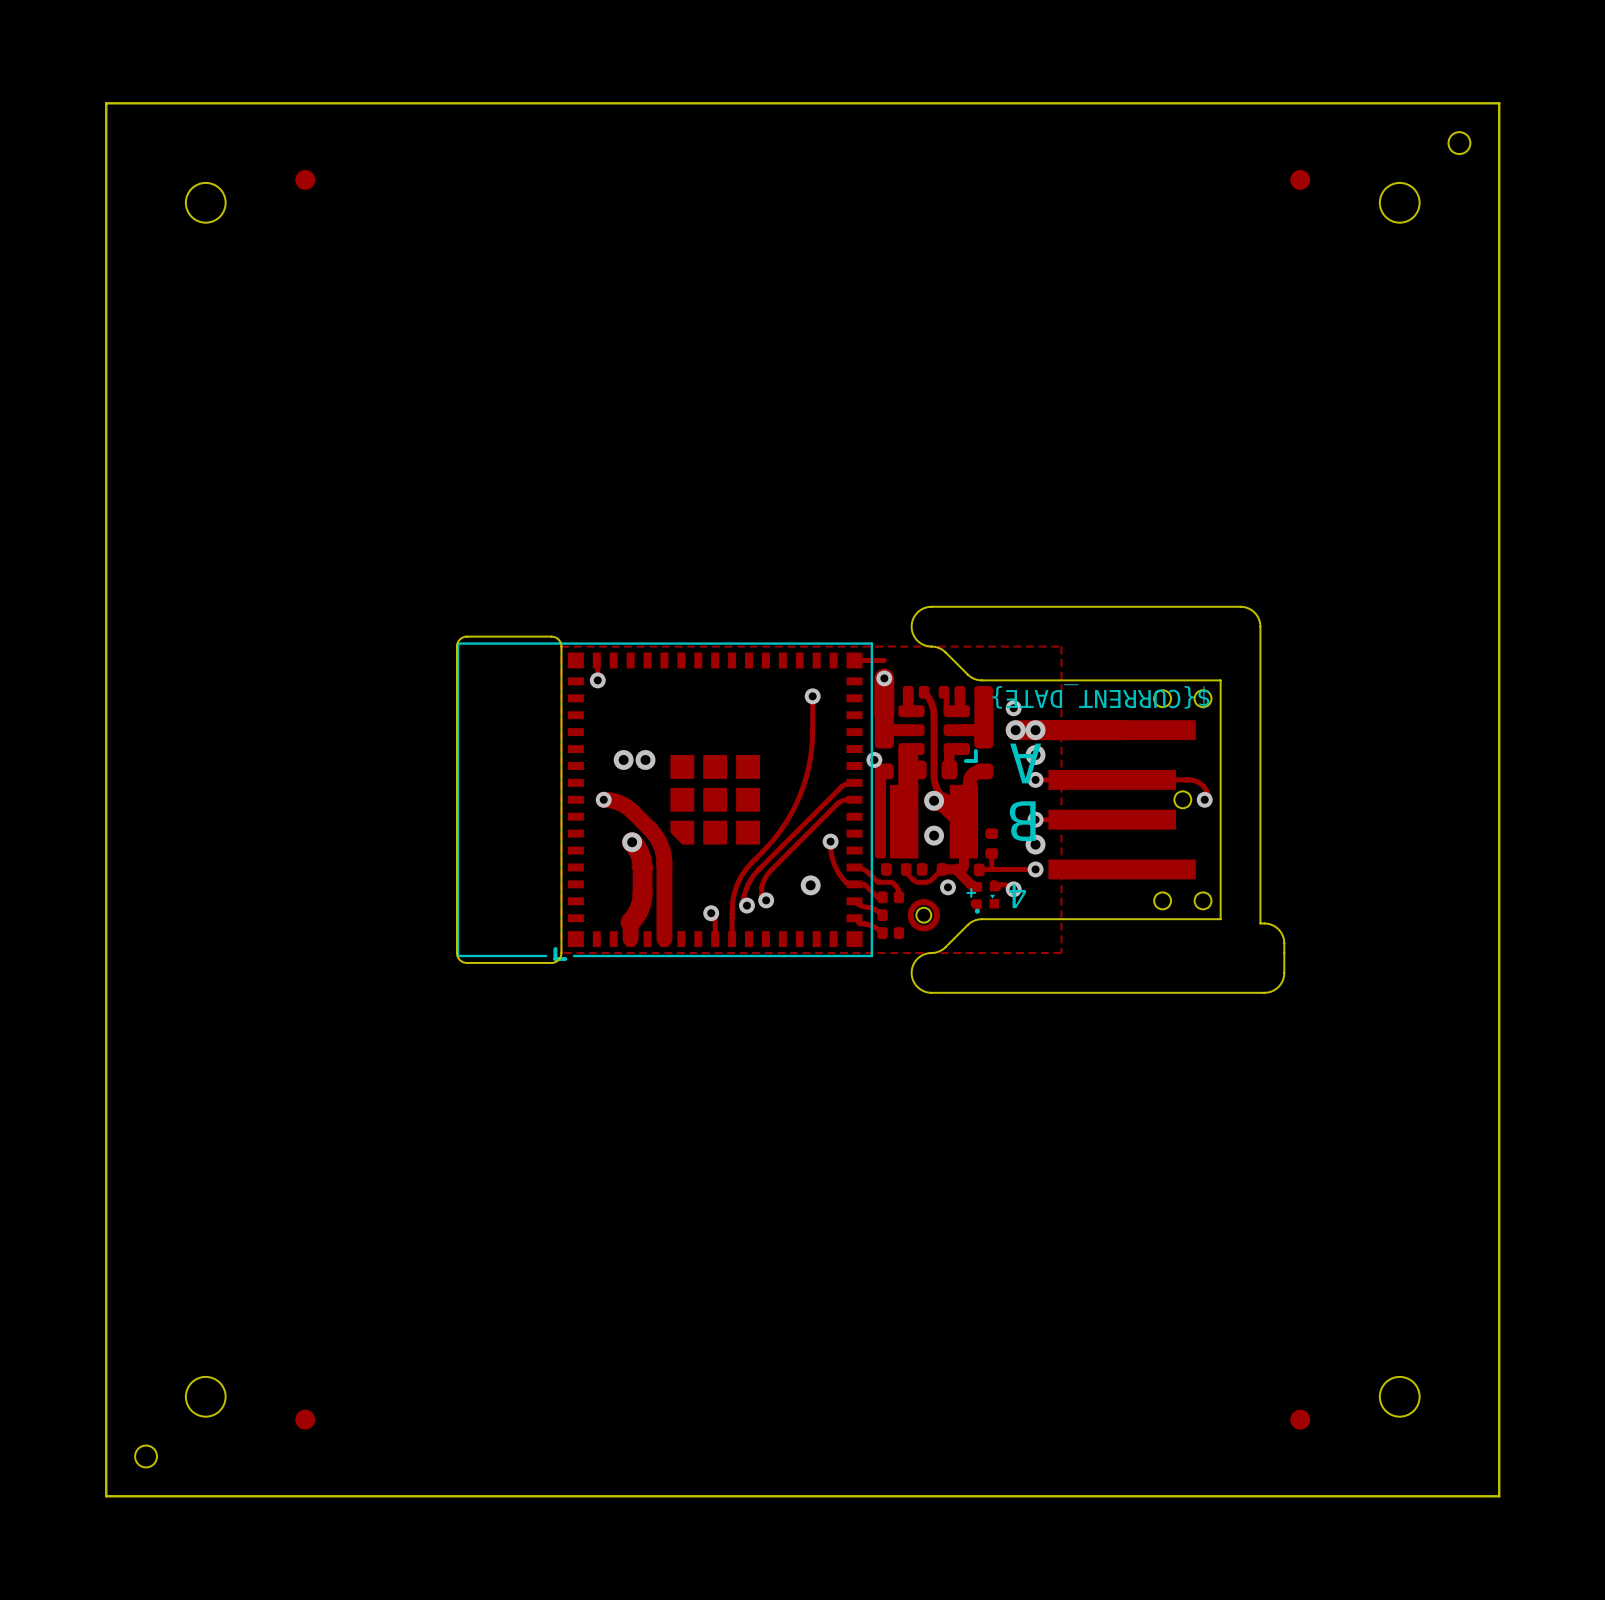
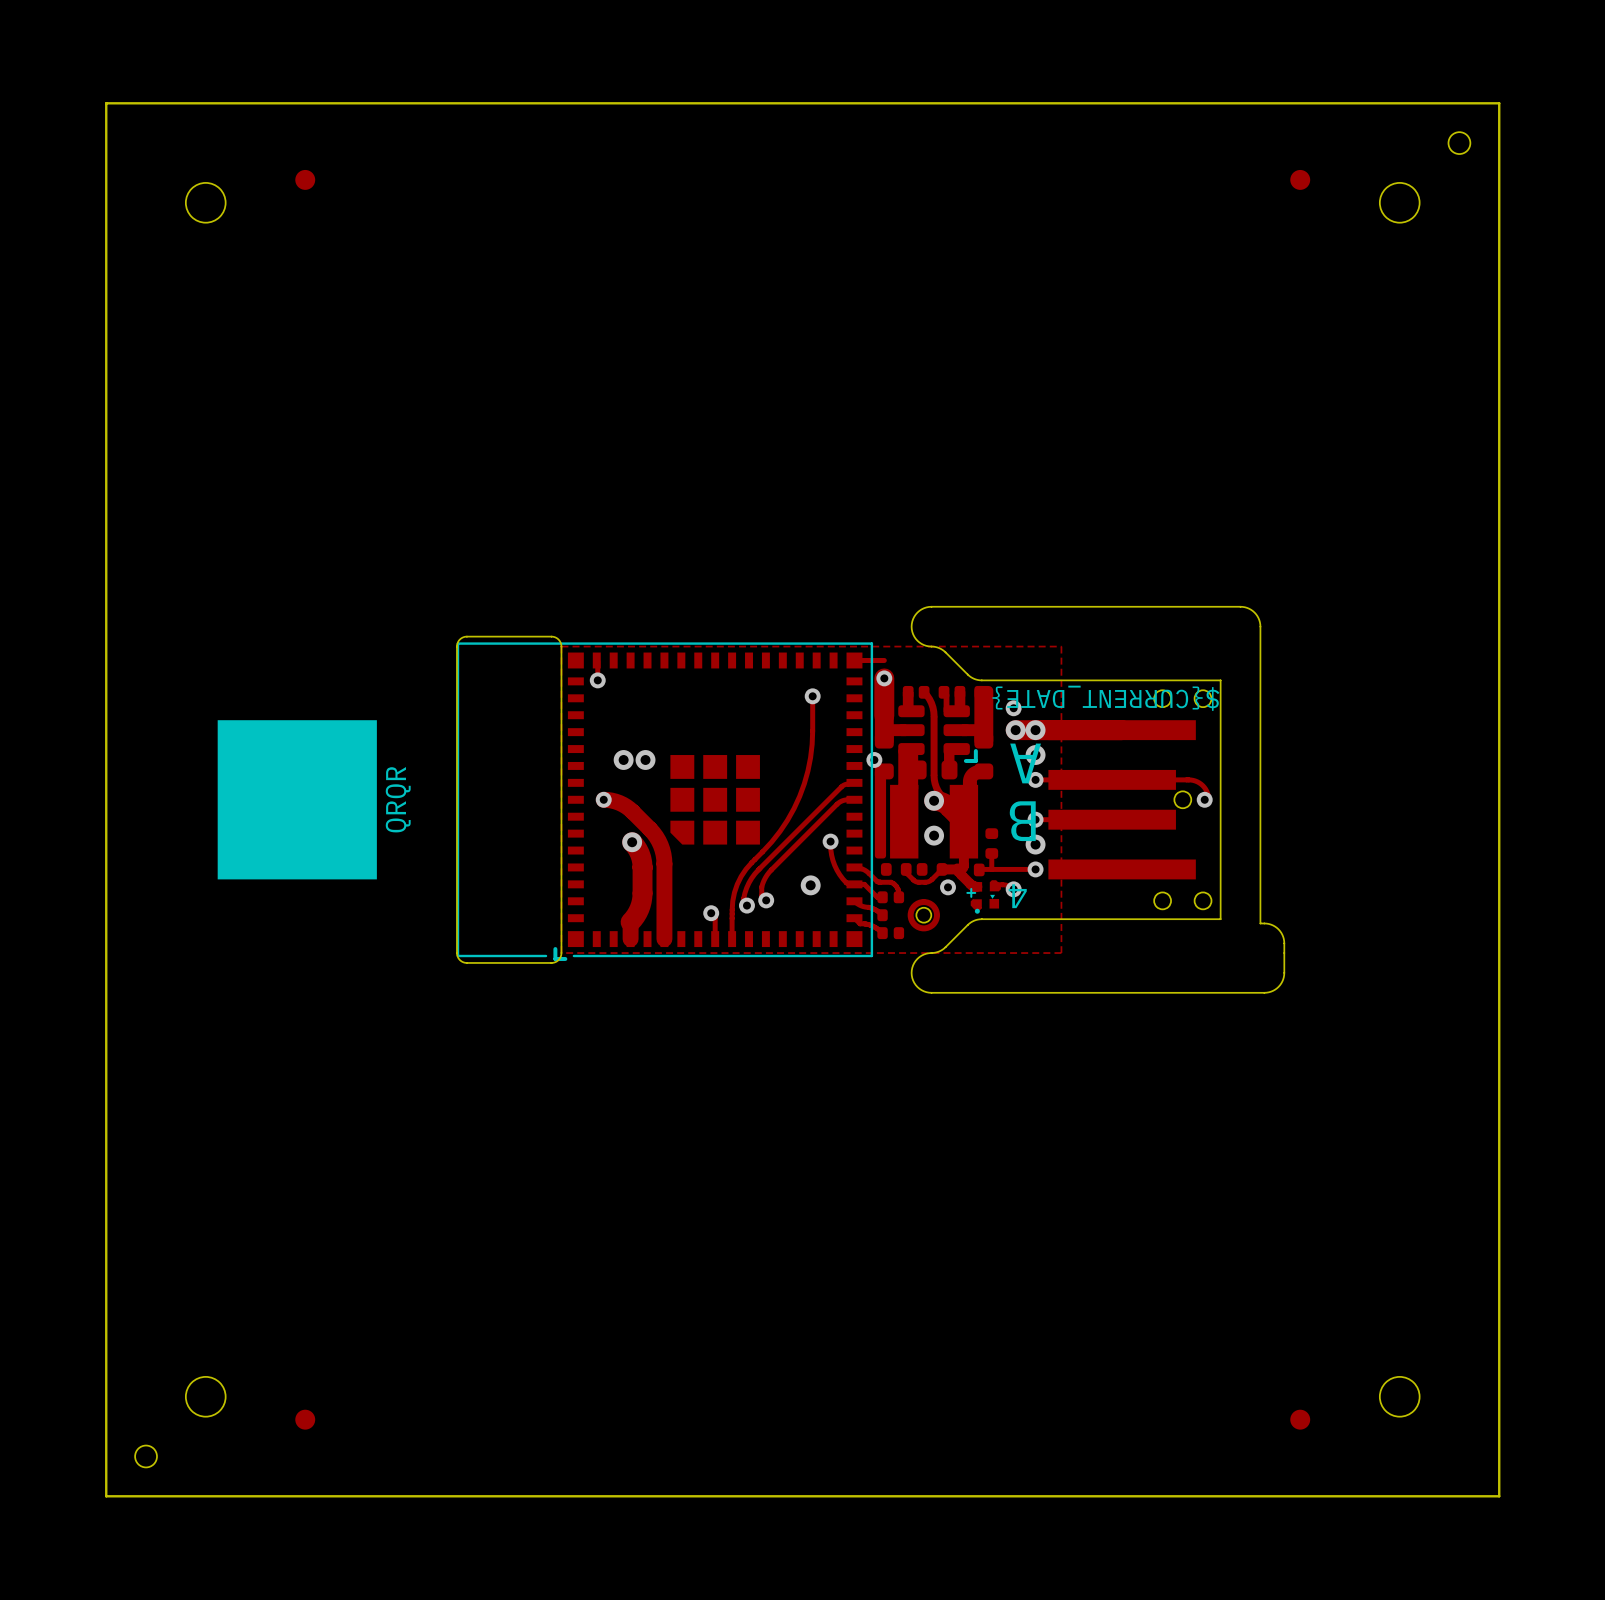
drawing: none -> [217, 720, 377, 880]
text: none -> QRQR (398, 799)

